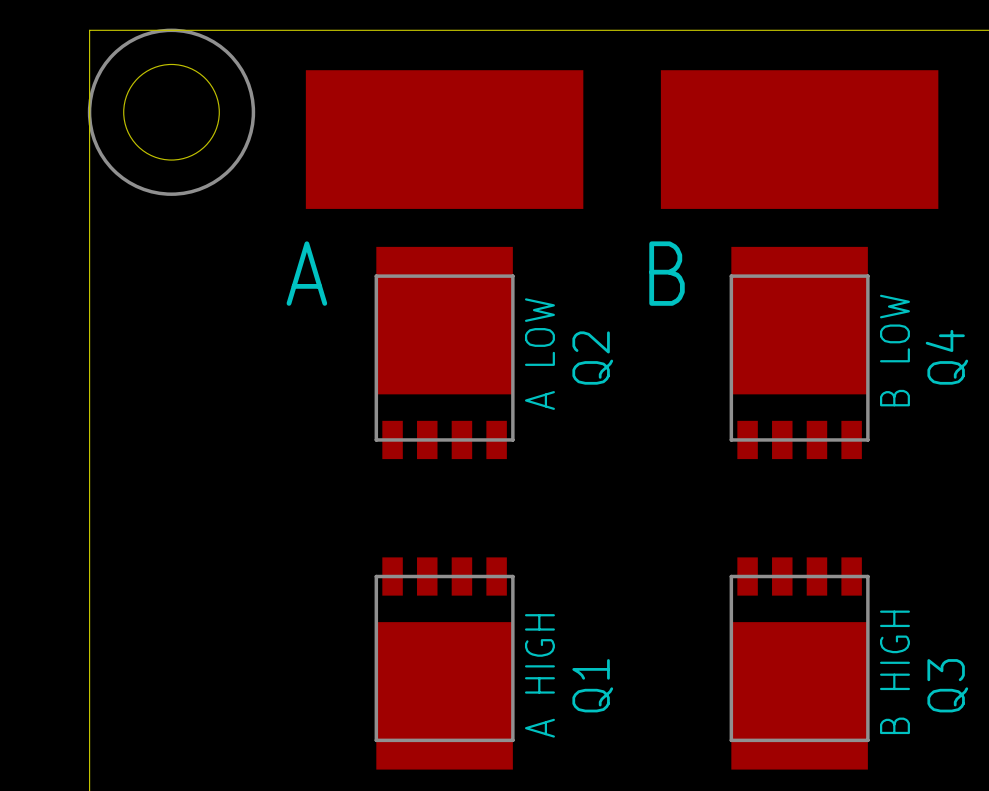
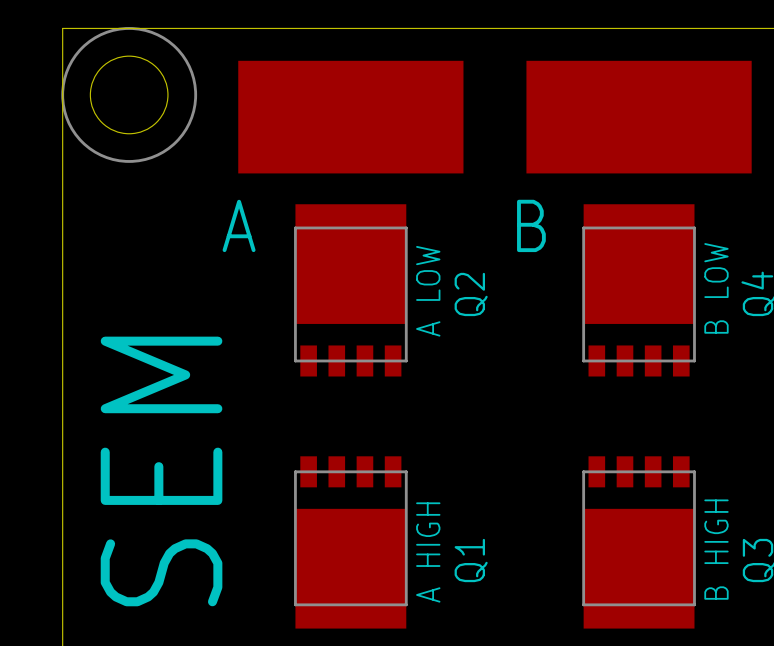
text: none -> SEM (161, 471)

